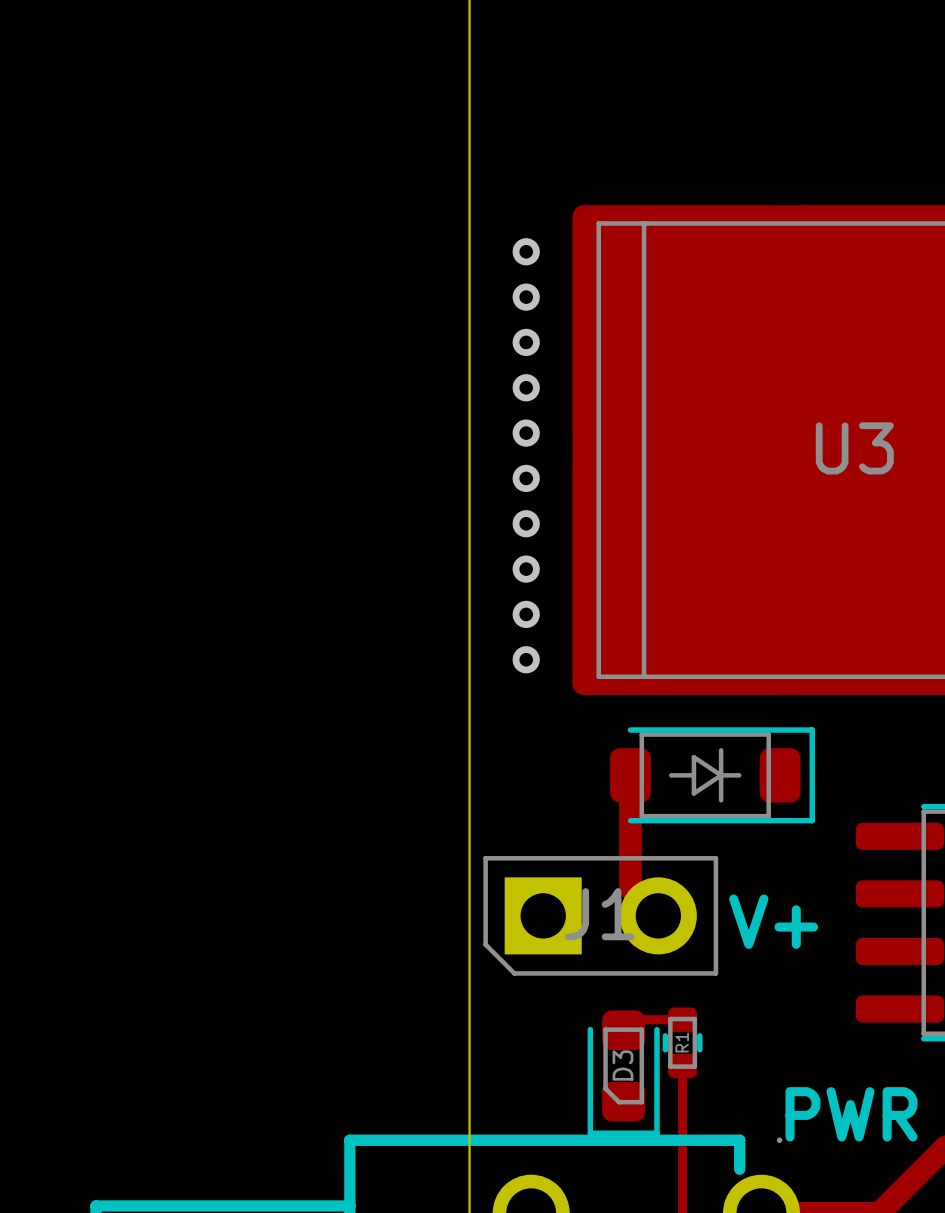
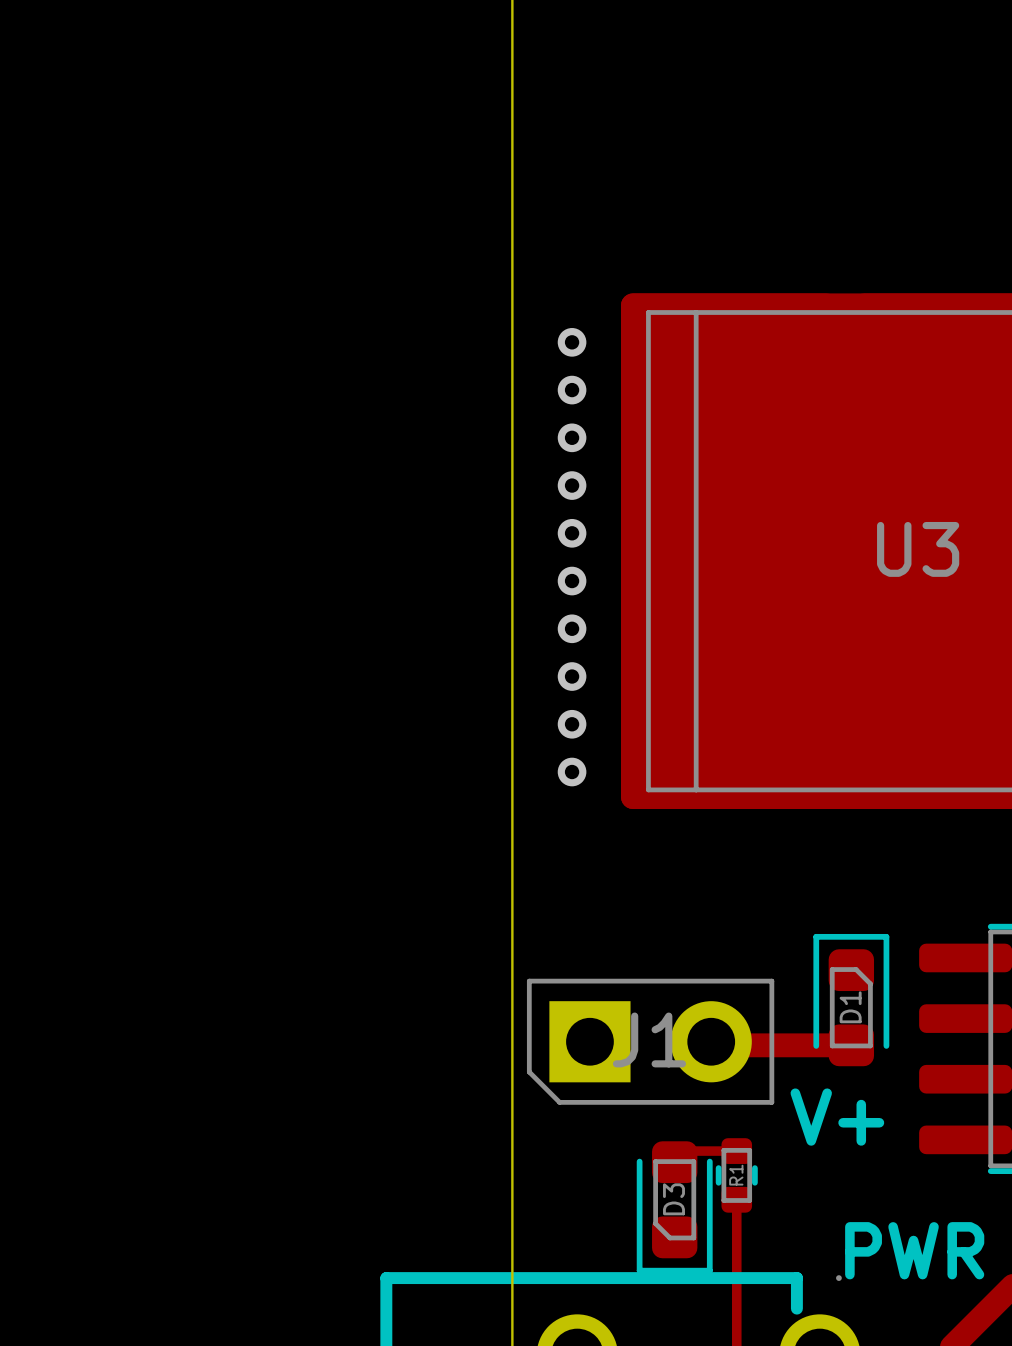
track: (630, 775) (630, 888) (658, 915) -> (851, 1045) (714, 1045) (711, 1041)
part: (712, 775) -> none
D1: none -> (851, 1000)
text position: V+ (773, 921) -> V+ (837, 1117)

